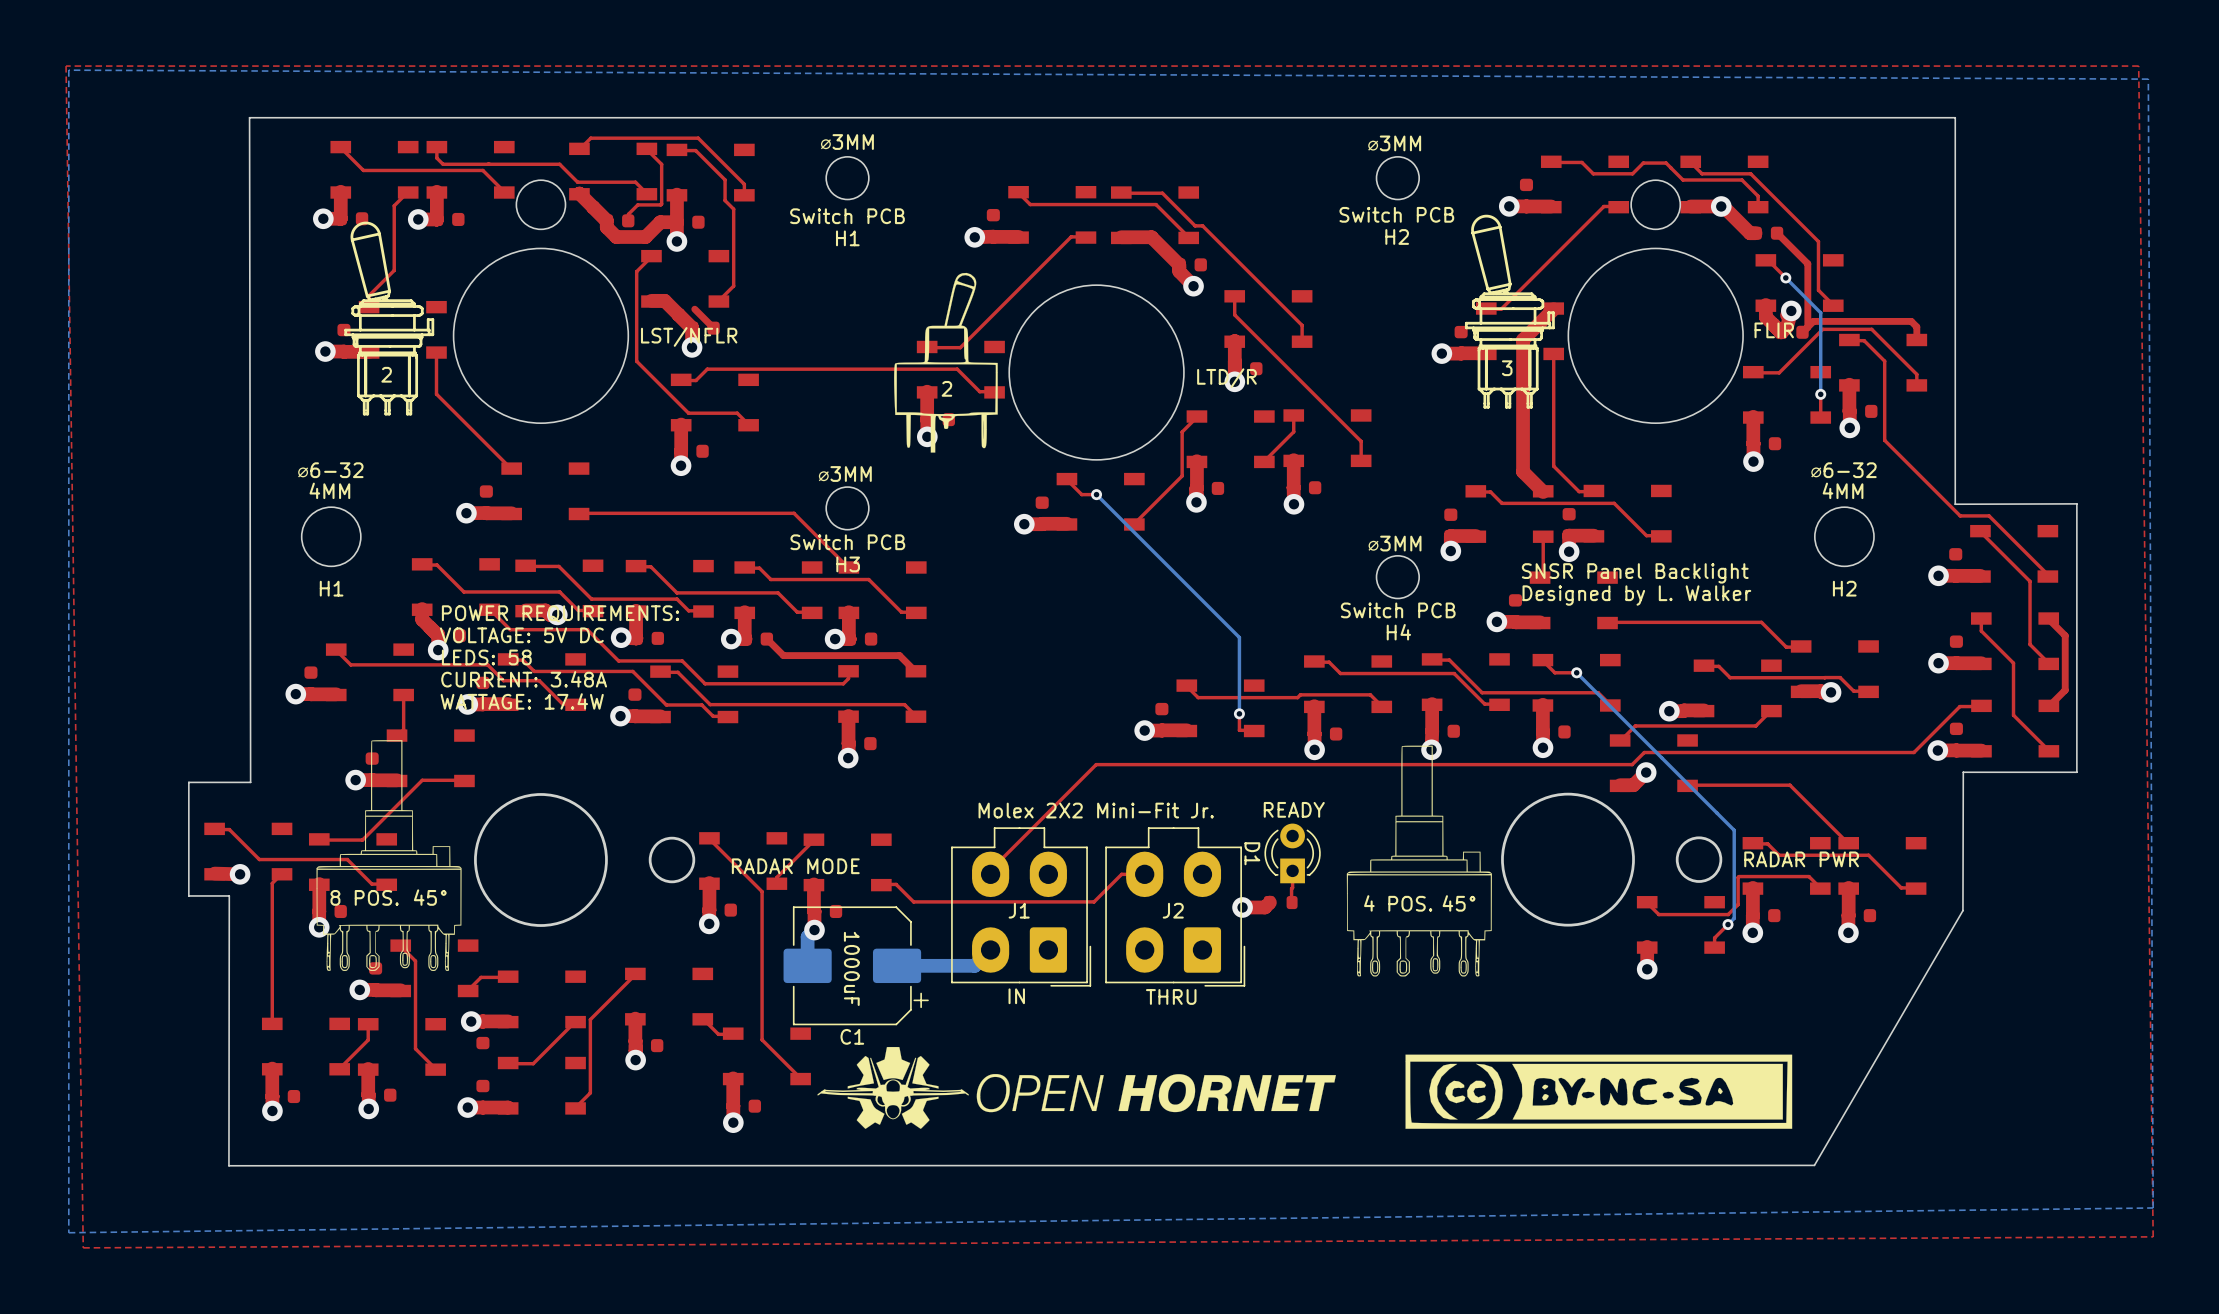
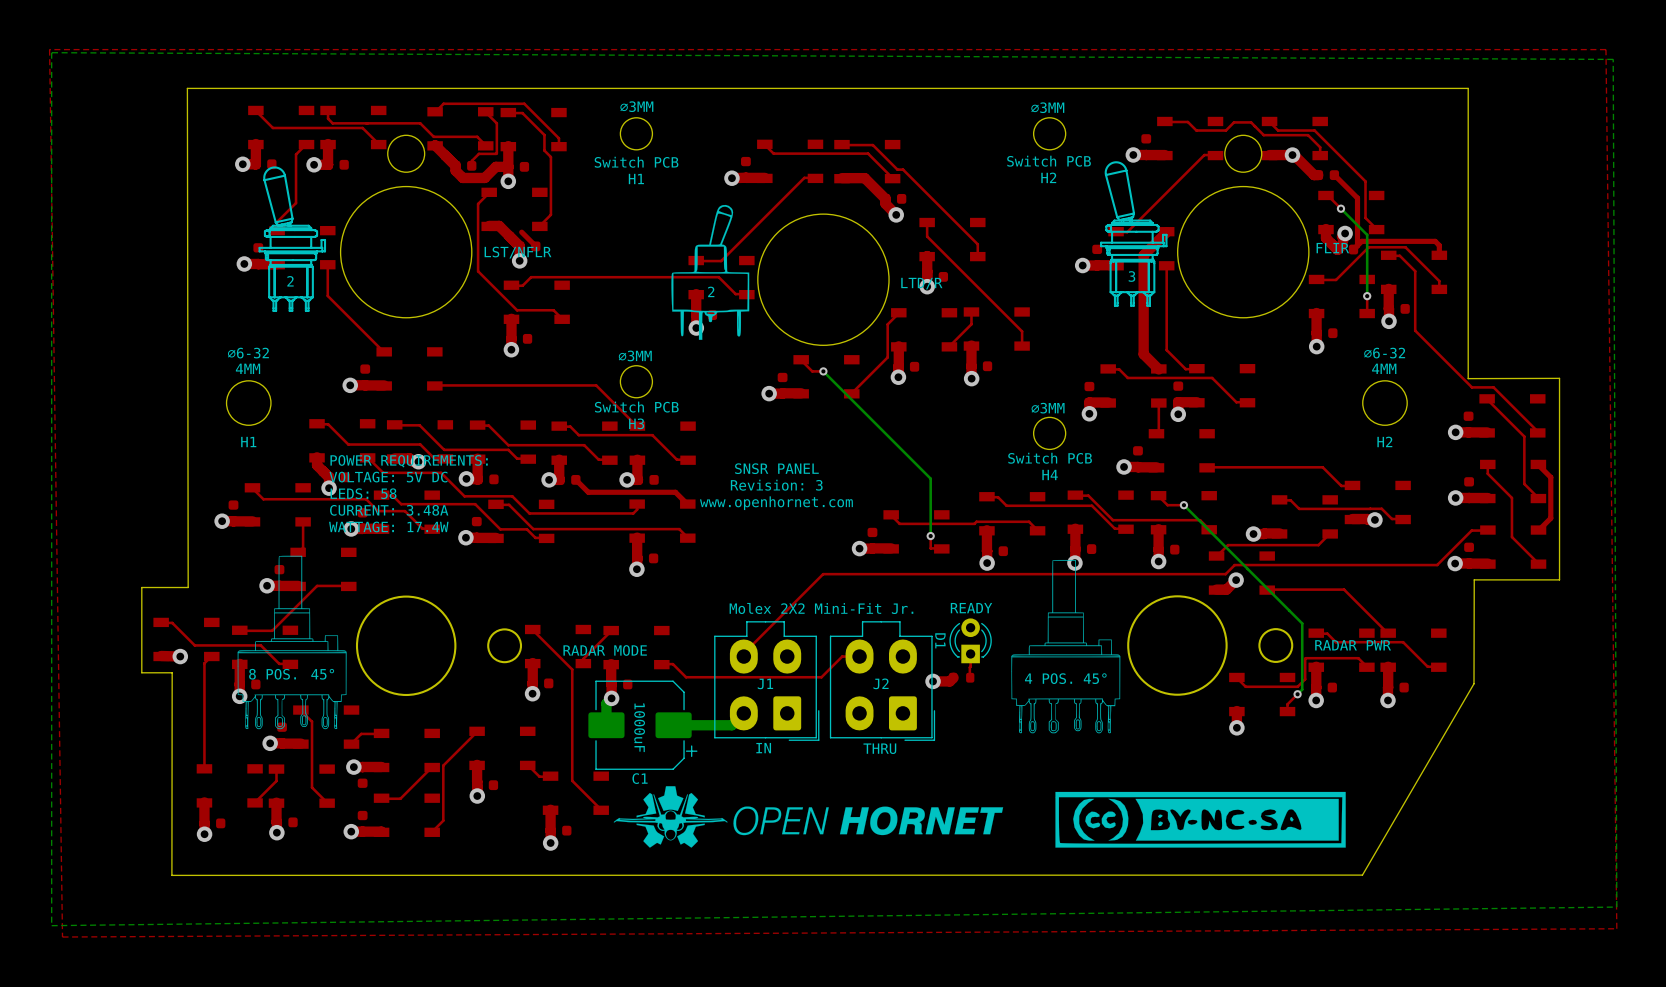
text: SNSR Panel Backlight (1635, 573) -> none
text: Designed by L. Walker (1636, 595) -> none
text: none -> SNSR PANEL (776, 468)
text: none -> Revision: 3 (776, 485)
text: none -> www.openhornet.com (776, 503)

